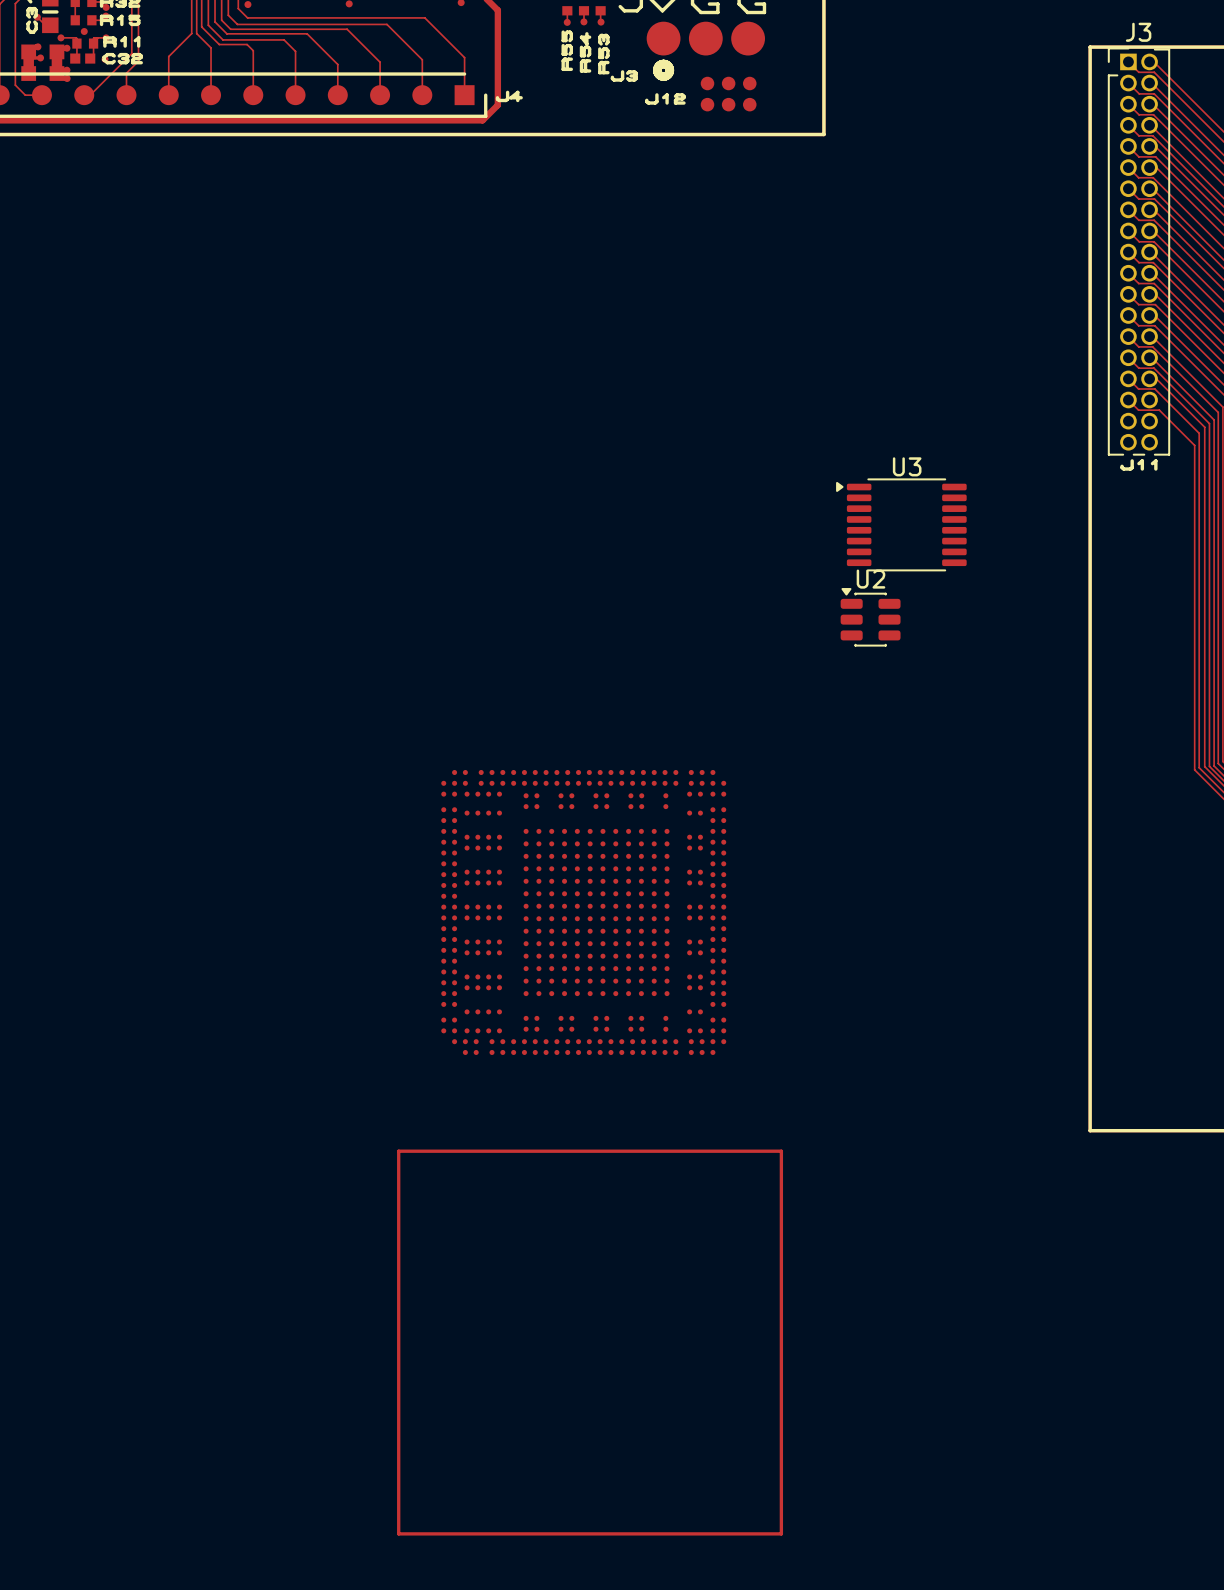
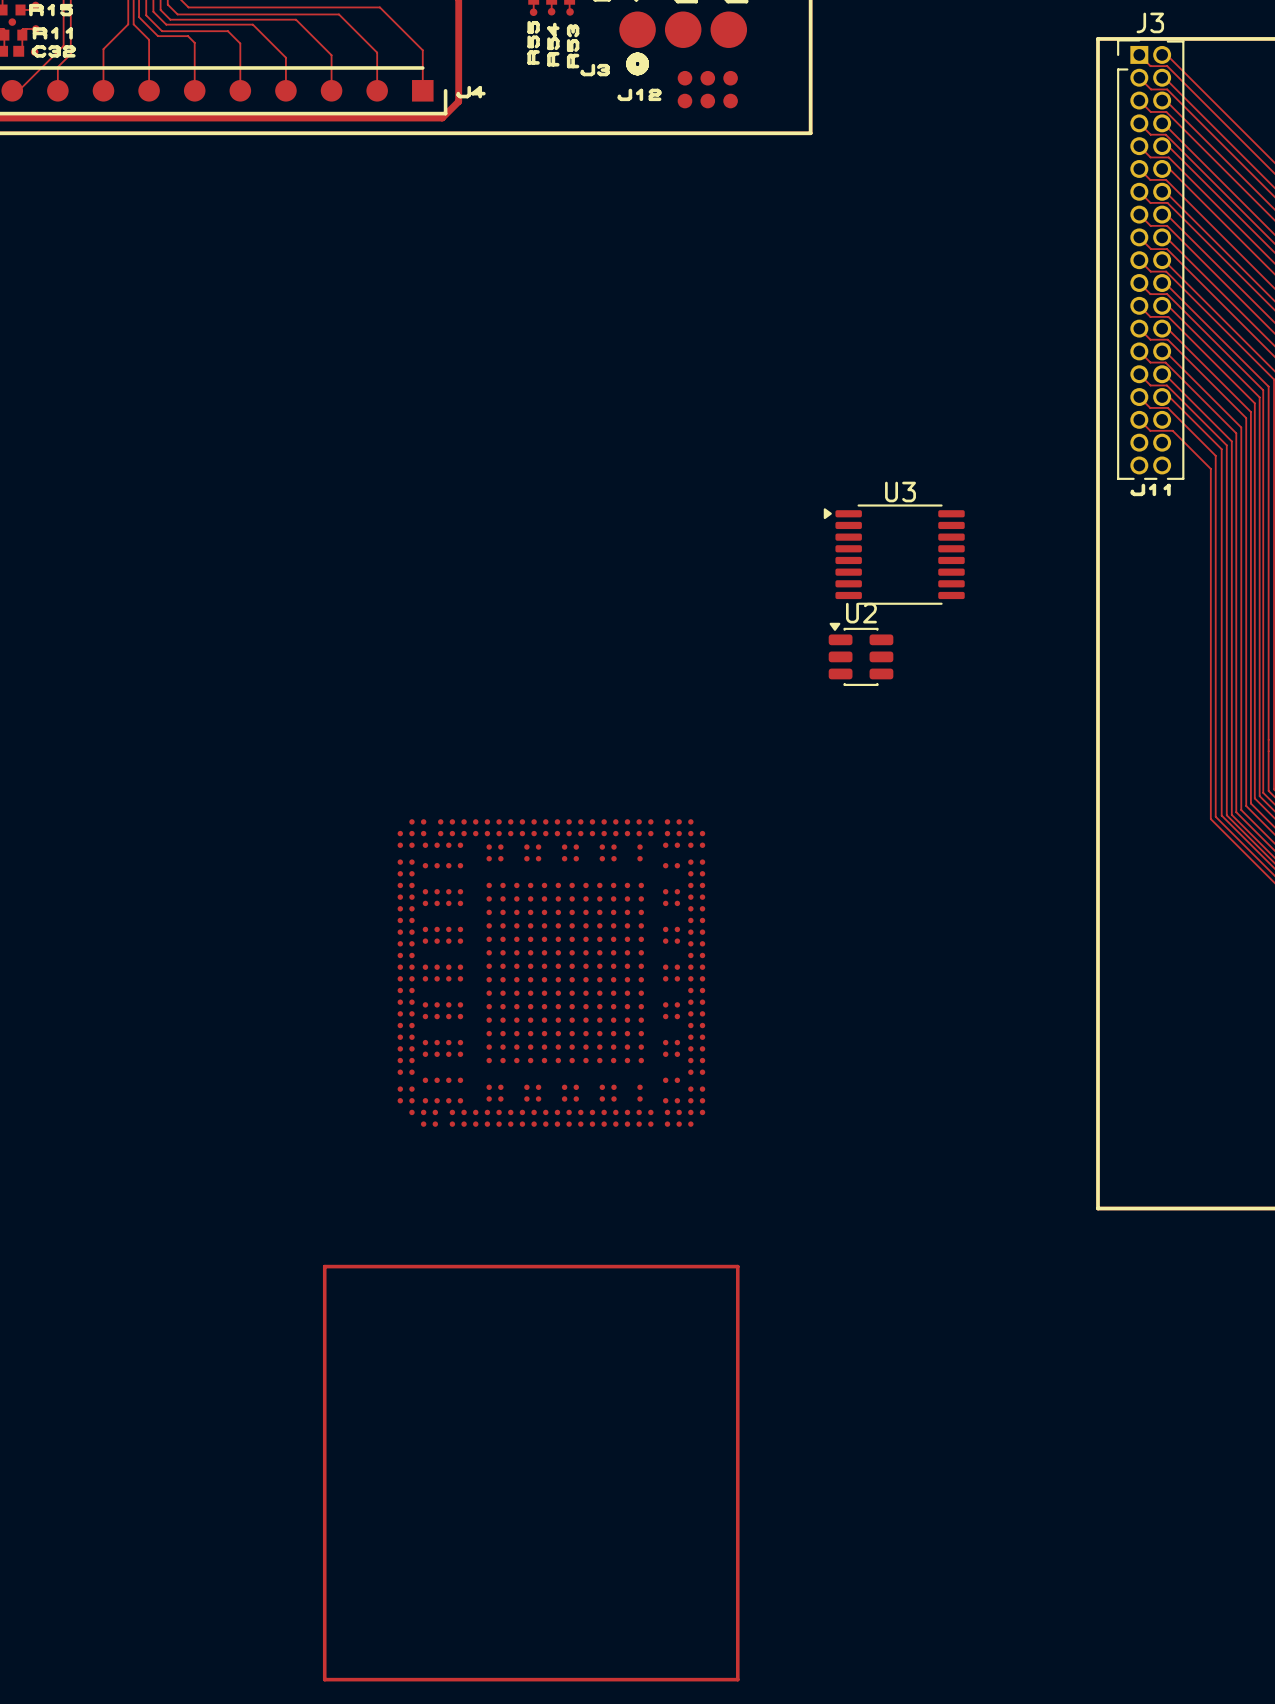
track: (398, 1151) (781, 1151) (781, 1533) (398, 1533) (398, 1151) -> (324, 1266) (737, 1266) (737, 1679) (324, 1679) (324, 1266)

